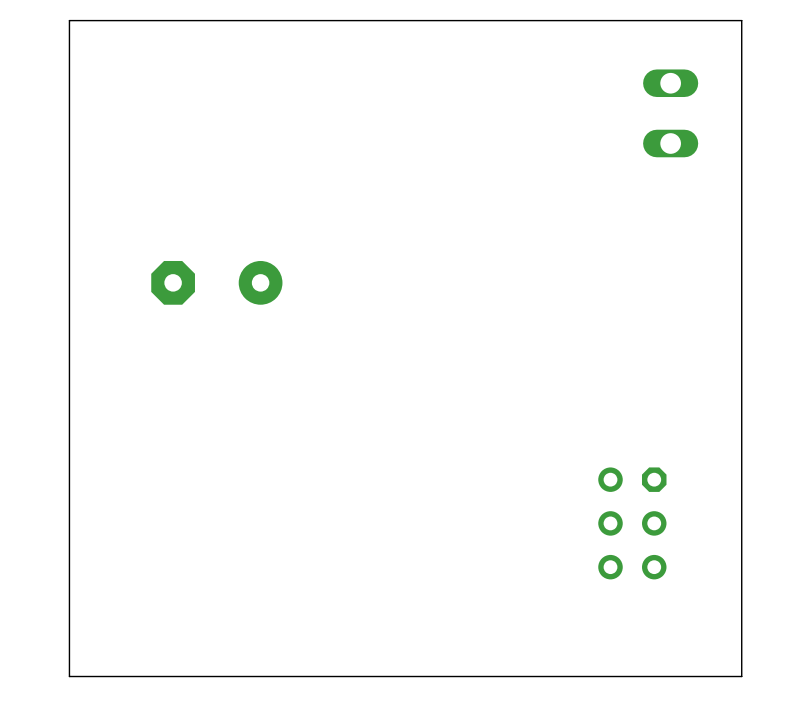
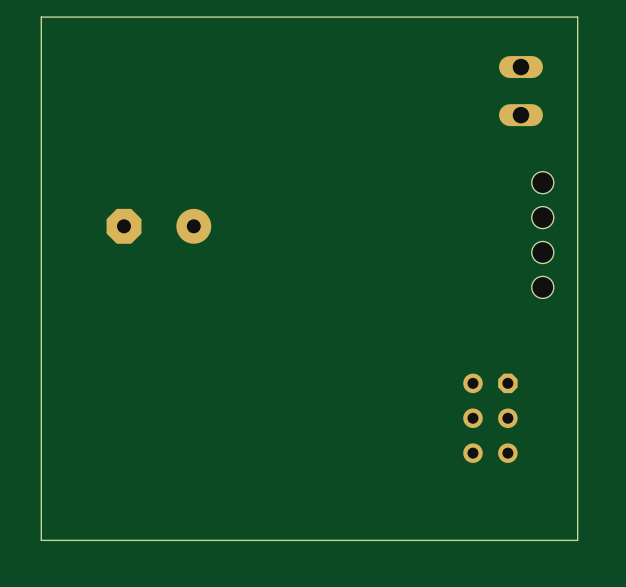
hole: none -> (542, 182)
hole: none -> (542, 217)
hole: none -> (542, 252)
hole: none -> (542, 287)

